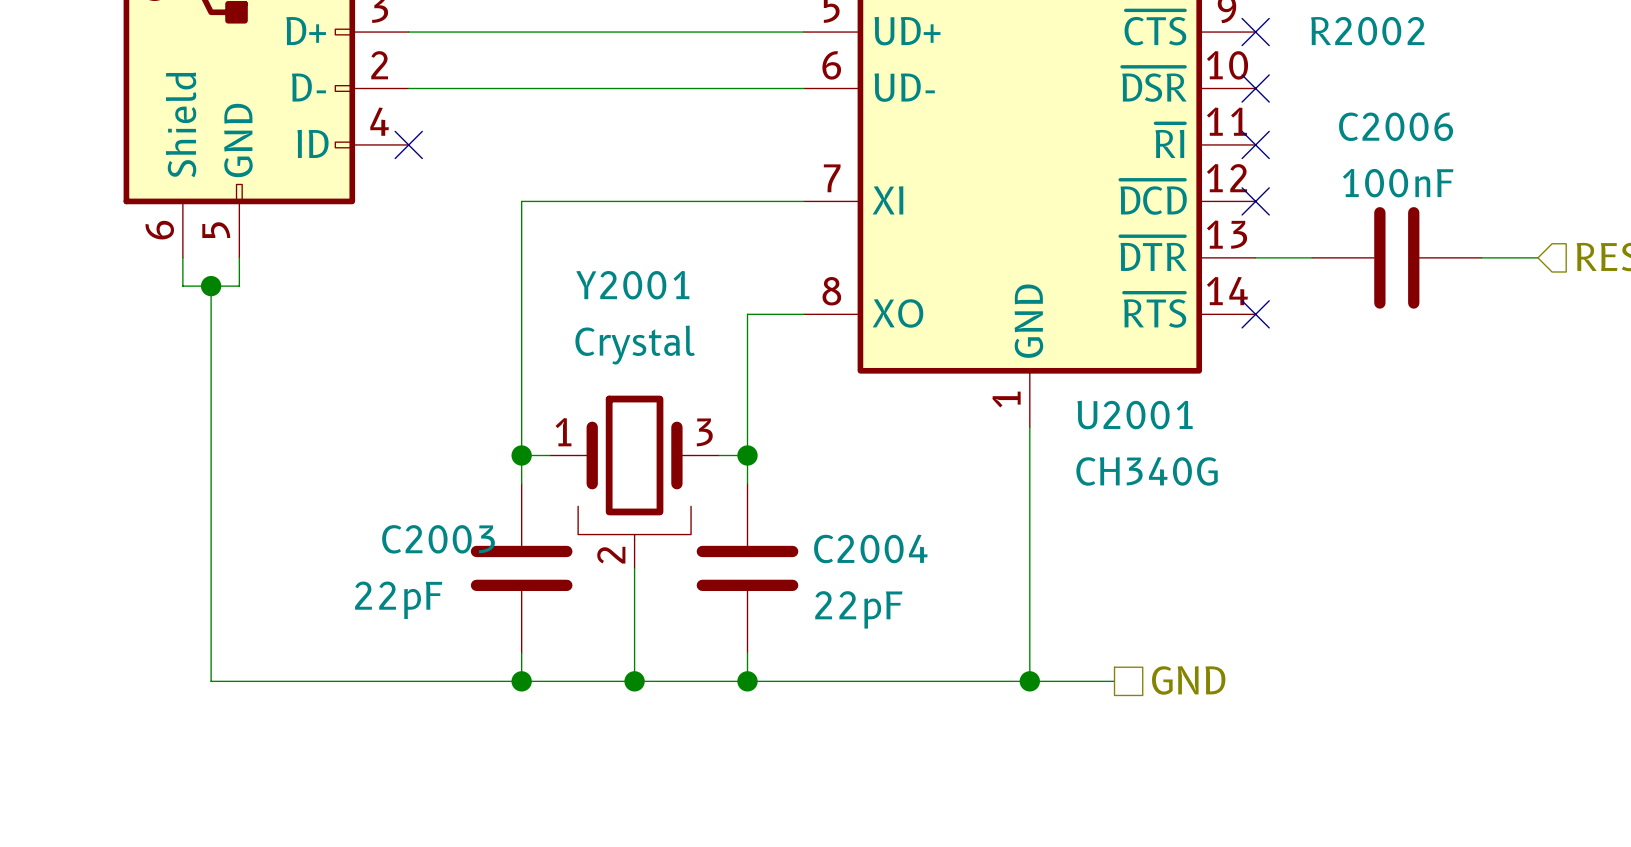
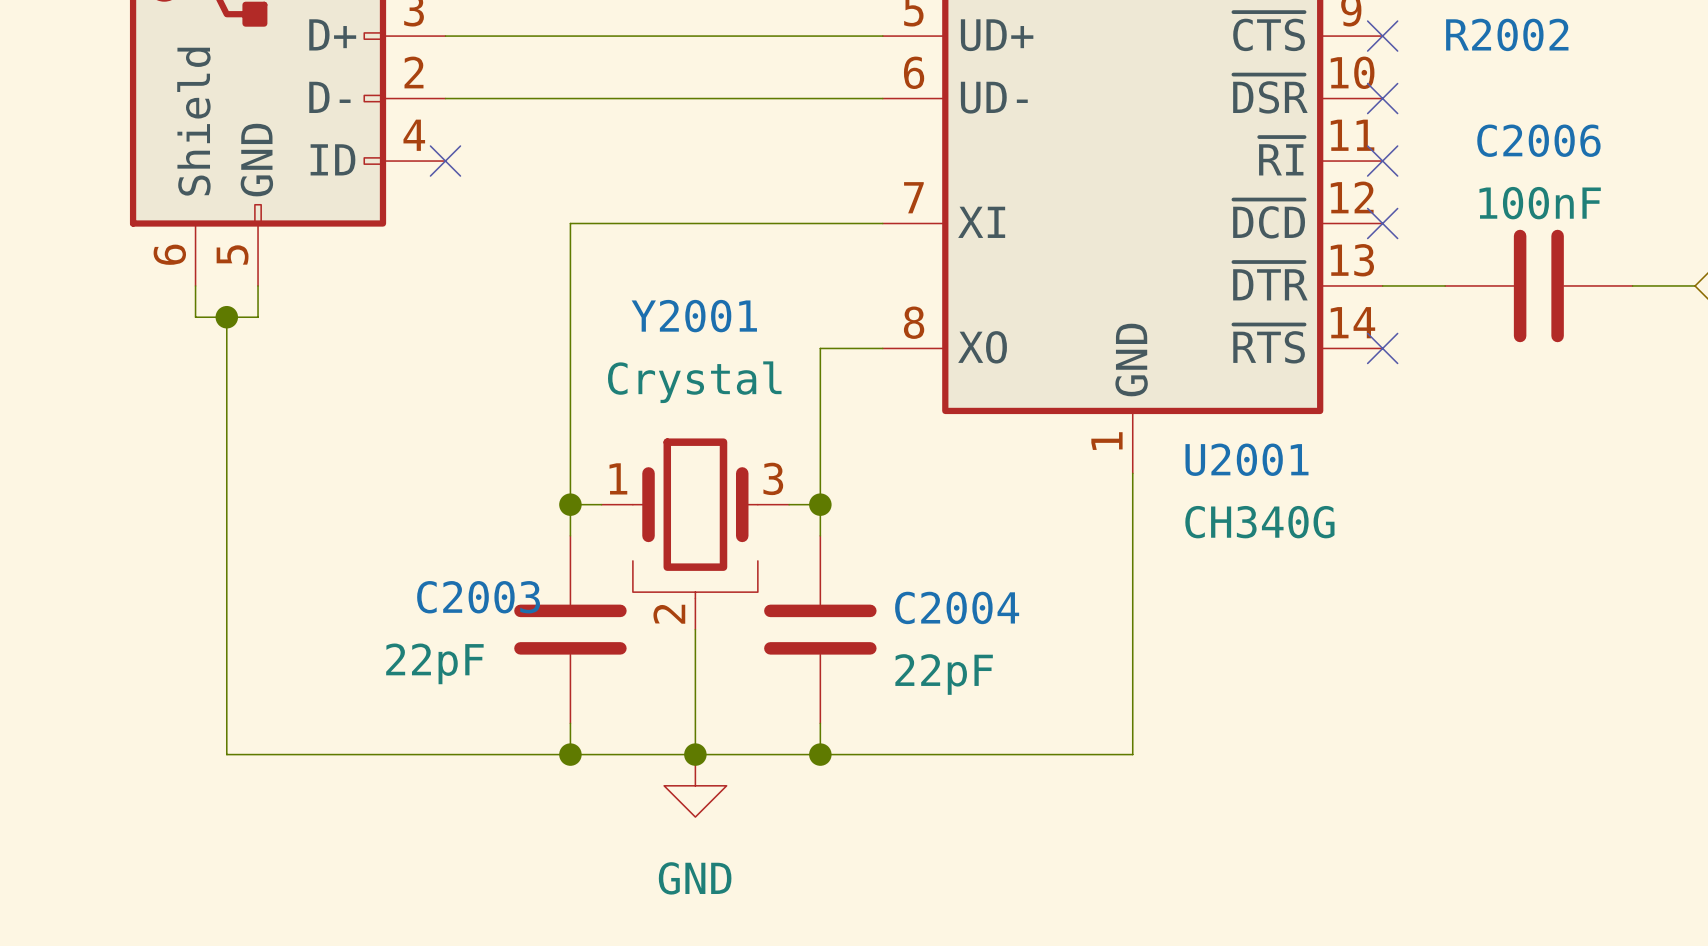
hierarchical label: GND (1188, 680) -> none
wire: (1029, 681) (1114, 681) -> none
junction: (1029, 681) -> none
power symbol: none -> GND (695, 785)

